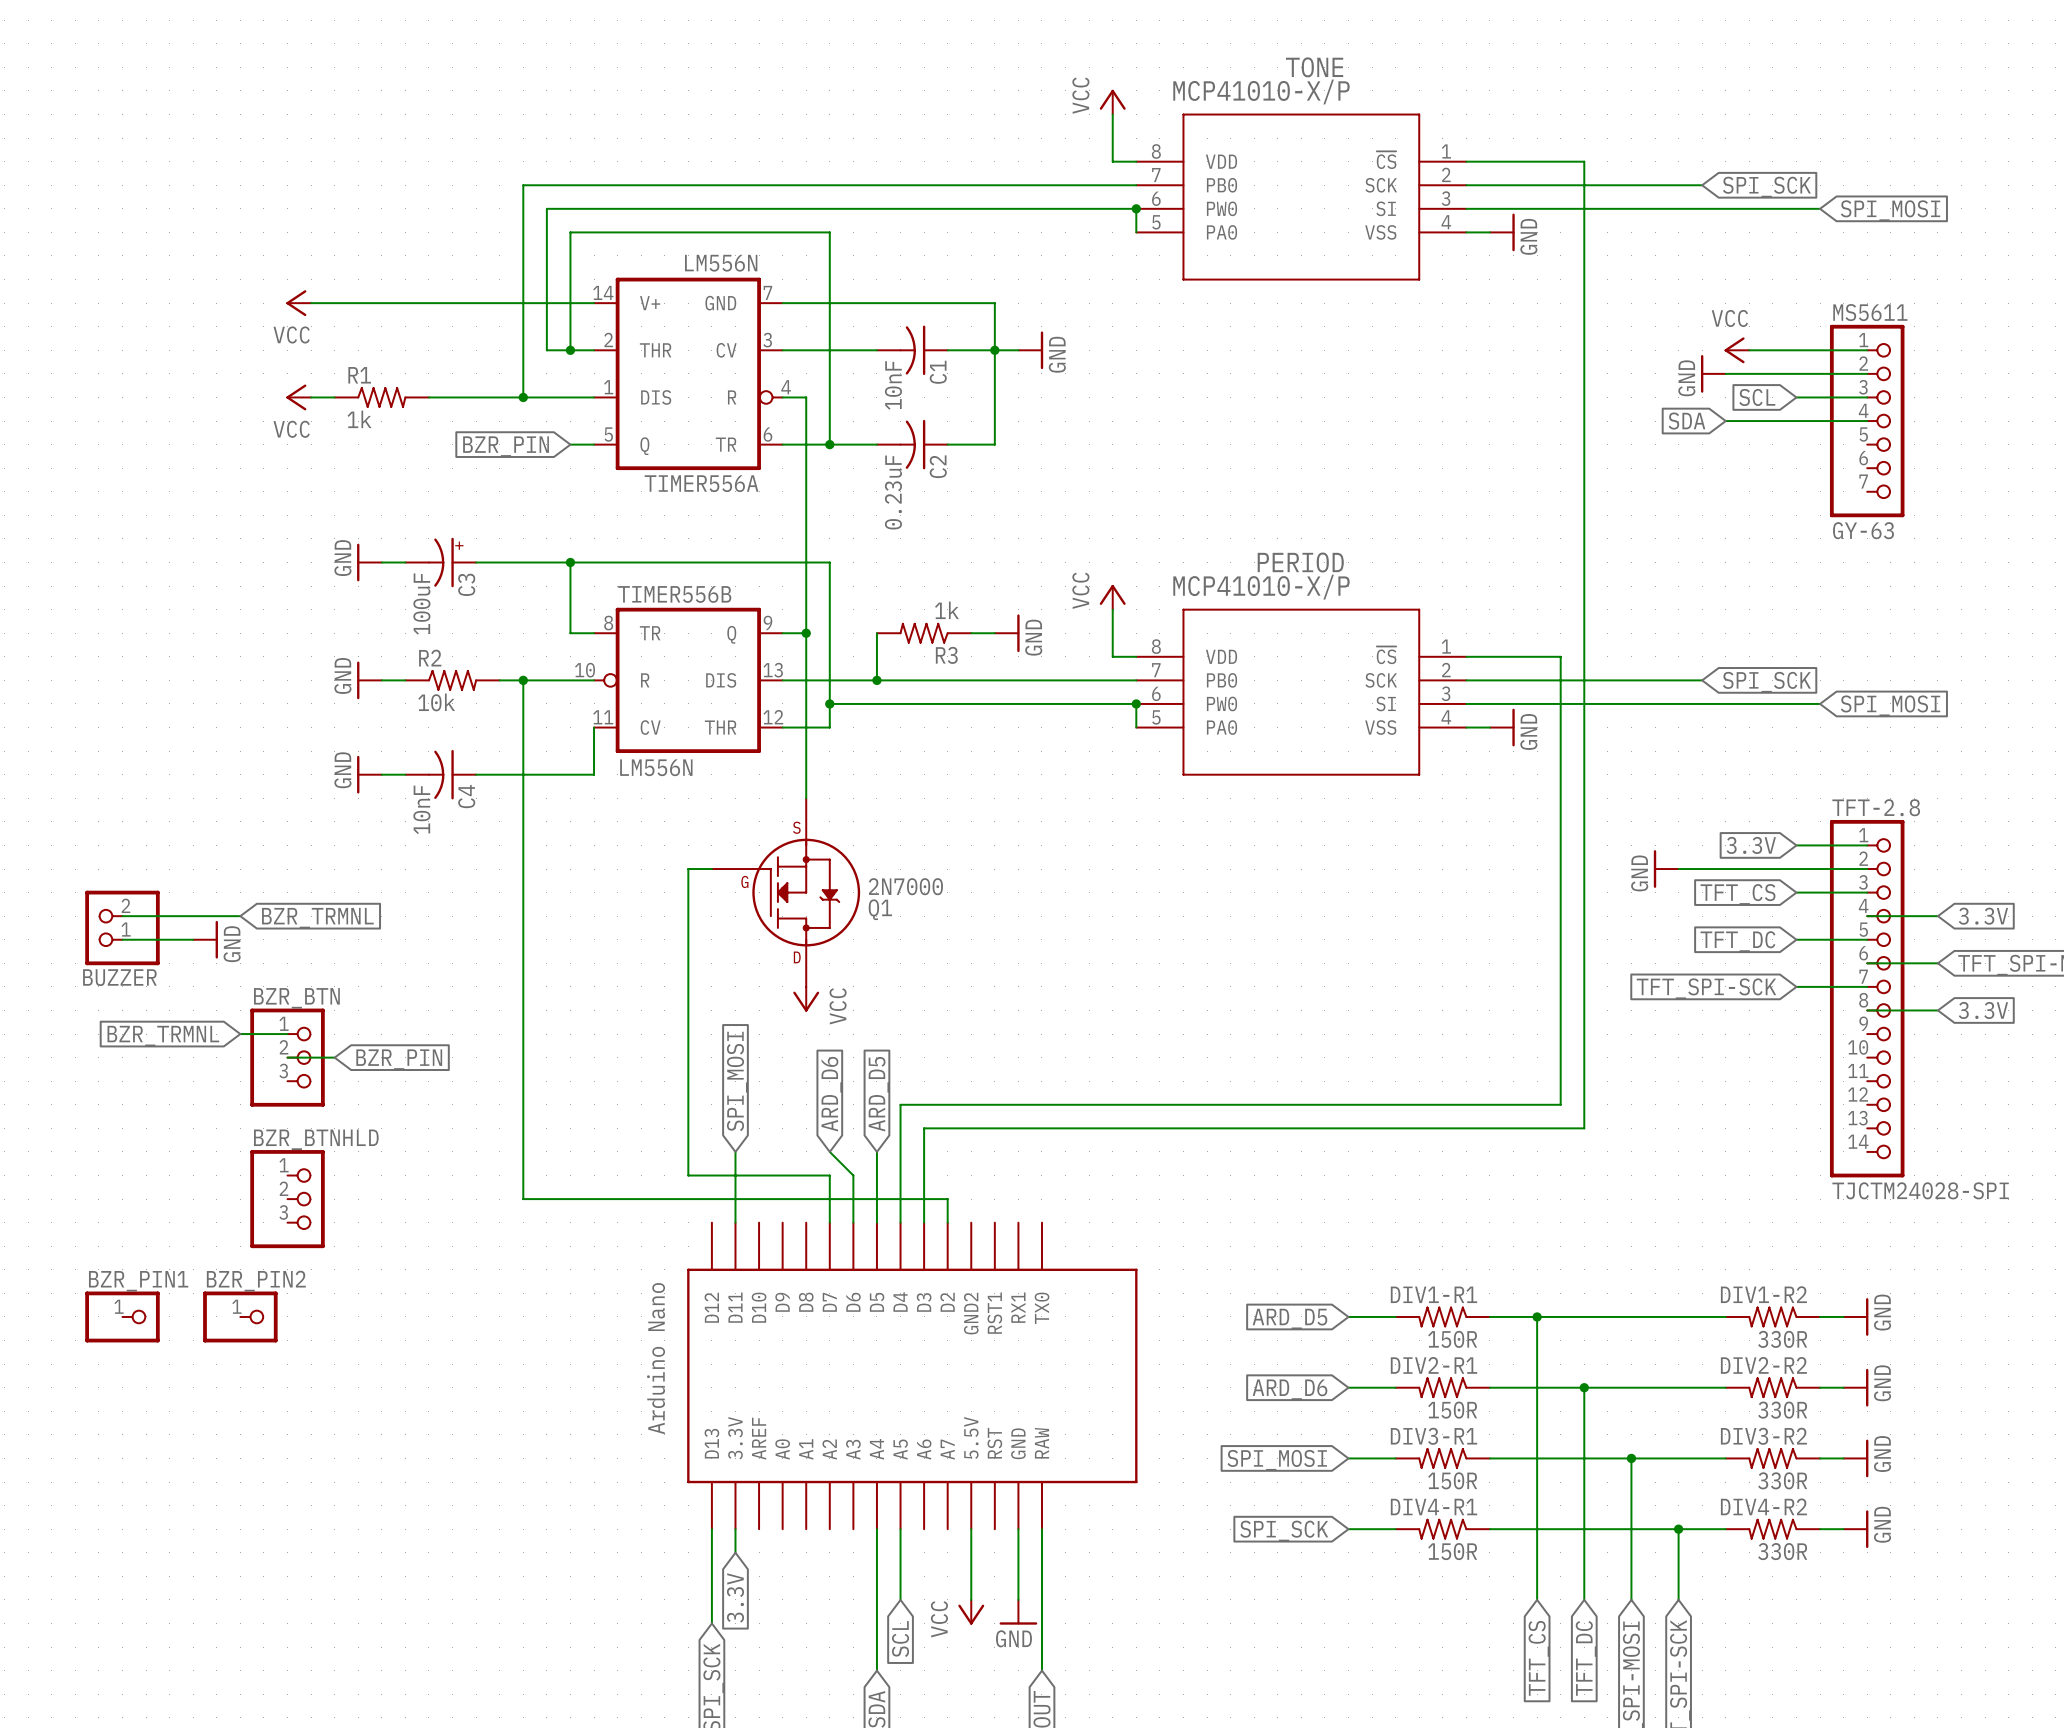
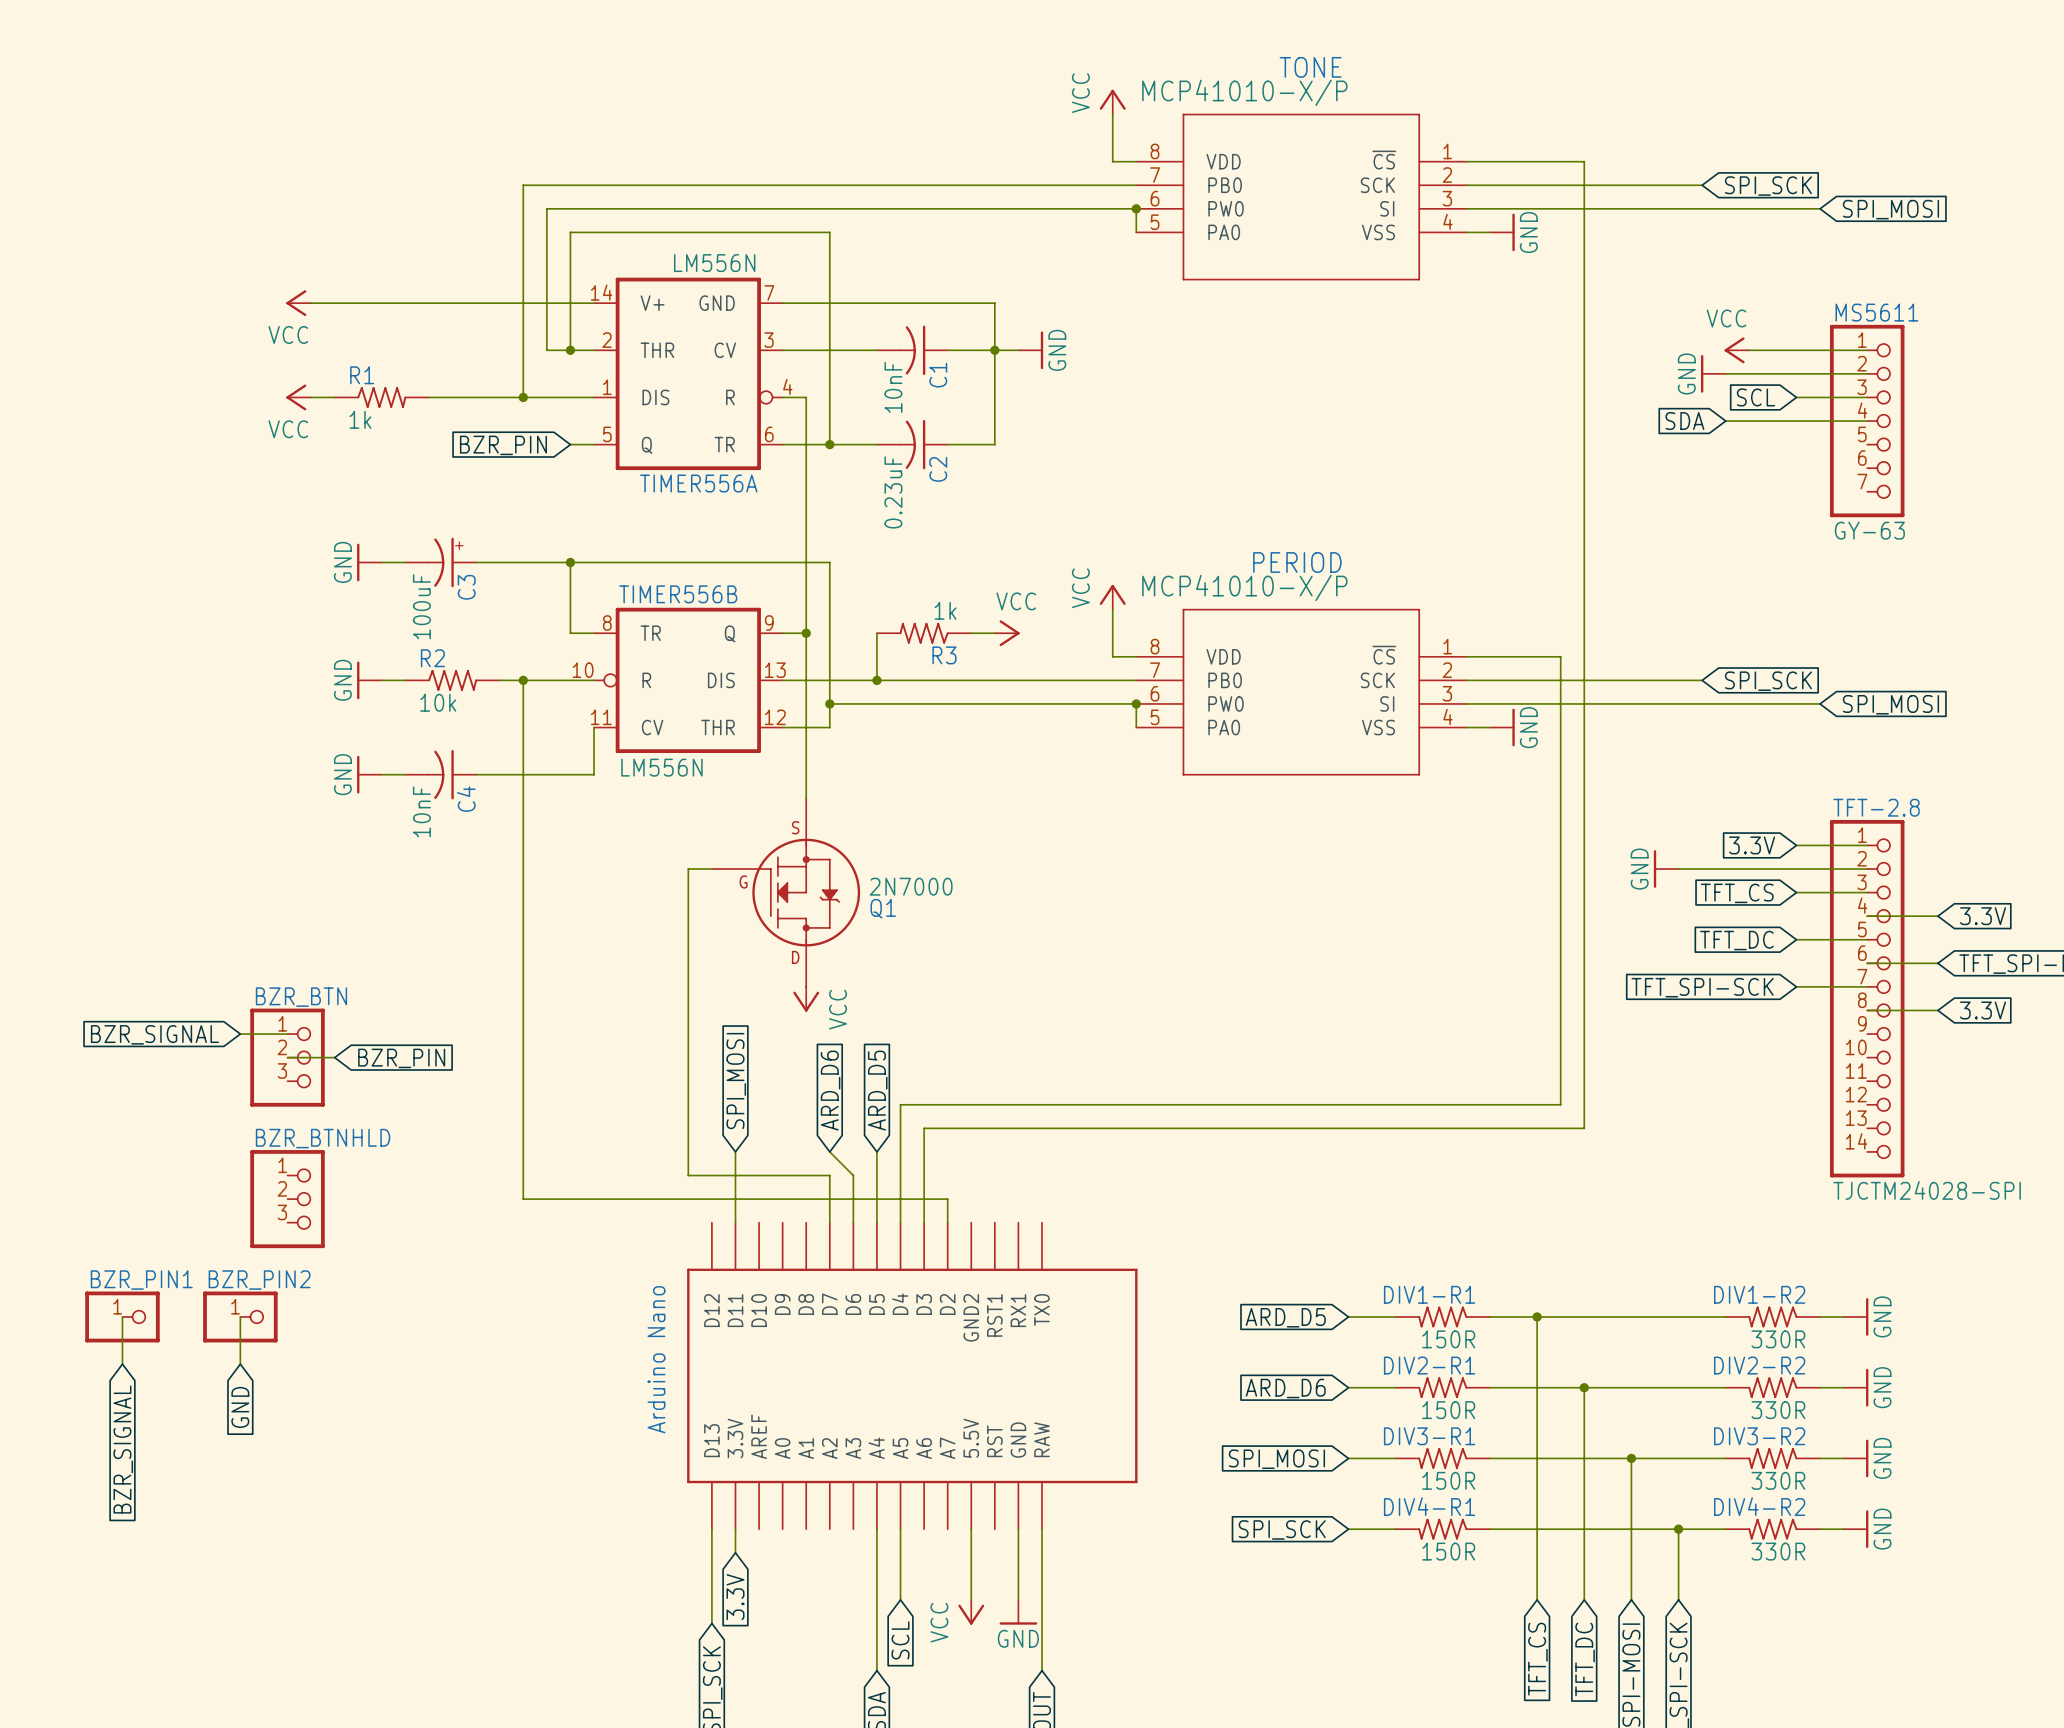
power symbol: GND (1007, 633) -> VCC (1007, 633)
wire: (122, 916) (240, 916) -> none
global label: BZR_TRMNL (317, 918) -> none
BUZZER: (122, 927) -> none
wire: (122, 939) (193, 939) -> none
power symbol: GND (205, 939) -> none
global label: BZR_TRMNL (163, 1036) -> BZR_SIGNAL (154, 1034)
wire: none -> (122, 1316) (122, 1364)
wire: none -> (240, 1316) (240, 1364)
global label: none -> GND (240, 1407)
global label: none -> BZR_SIGNAL (123, 1449)

